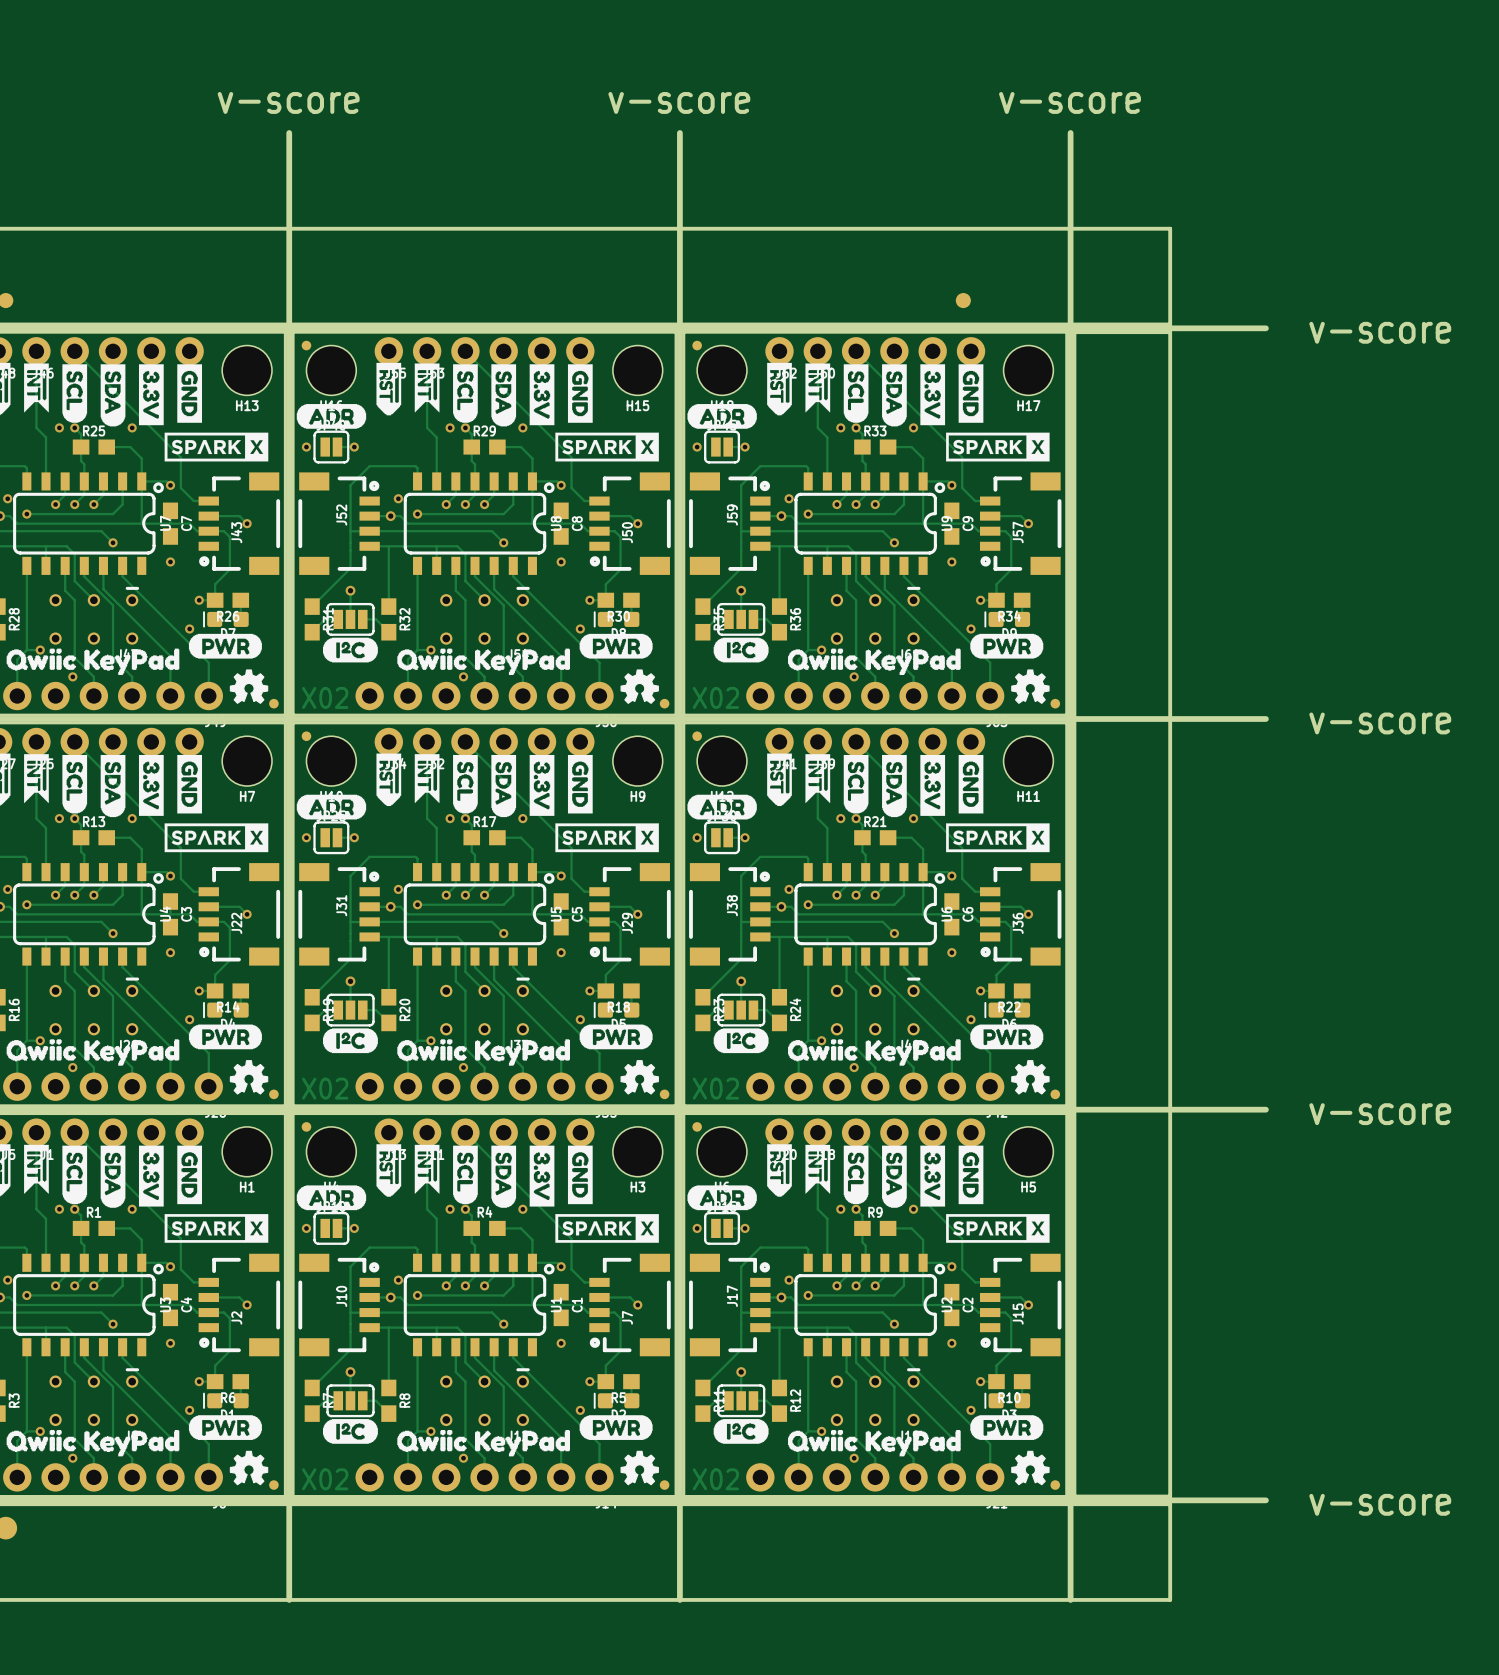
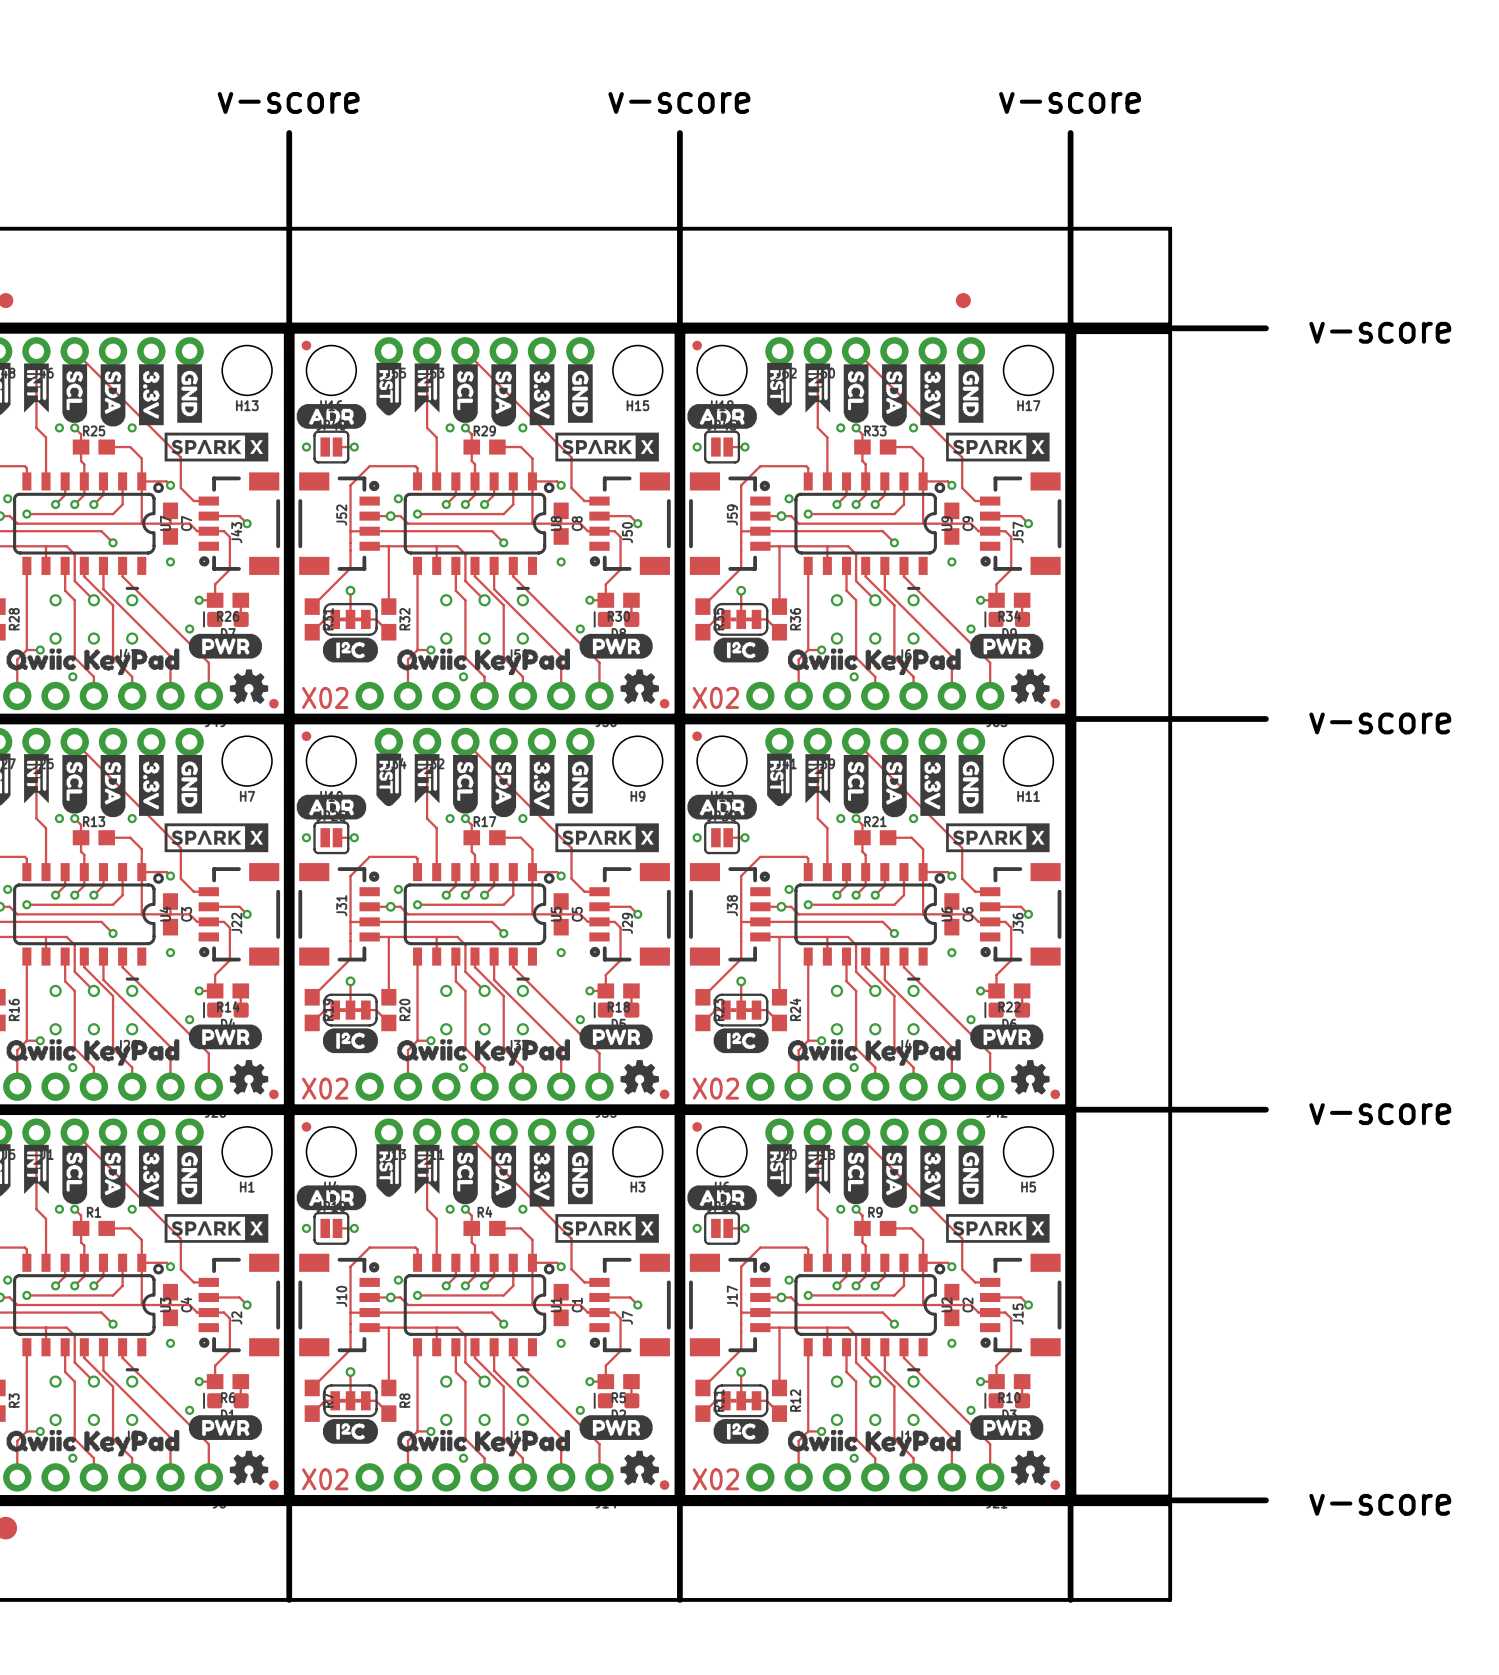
part footprint: [326, 602, 375, 636] -> [323, 602, 378, 636]
part footprint: [717, 602, 766, 636] -> [714, 602, 769, 636]
part footprint: [326, 993, 375, 1027] -> [323, 993, 378, 1027]
part footprint: [717, 993, 766, 1027] -> [714, 993, 769, 1027]
part footprint: [326, 1384, 375, 1418] -> [323, 1384, 378, 1418]
part footprint: [717, 1384, 766, 1418] -> [714, 1384, 769, 1418]

